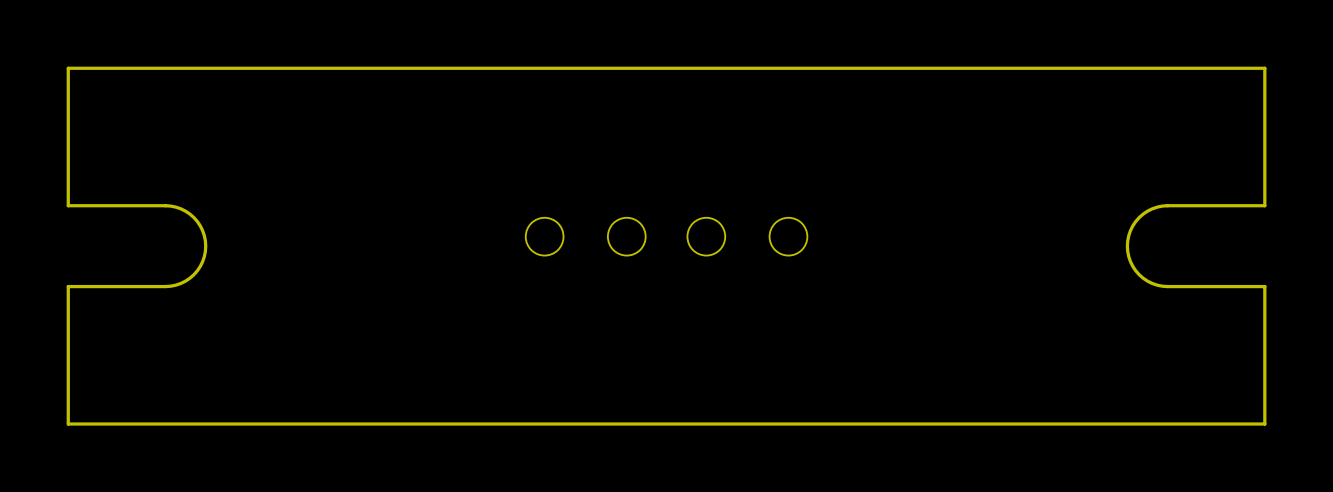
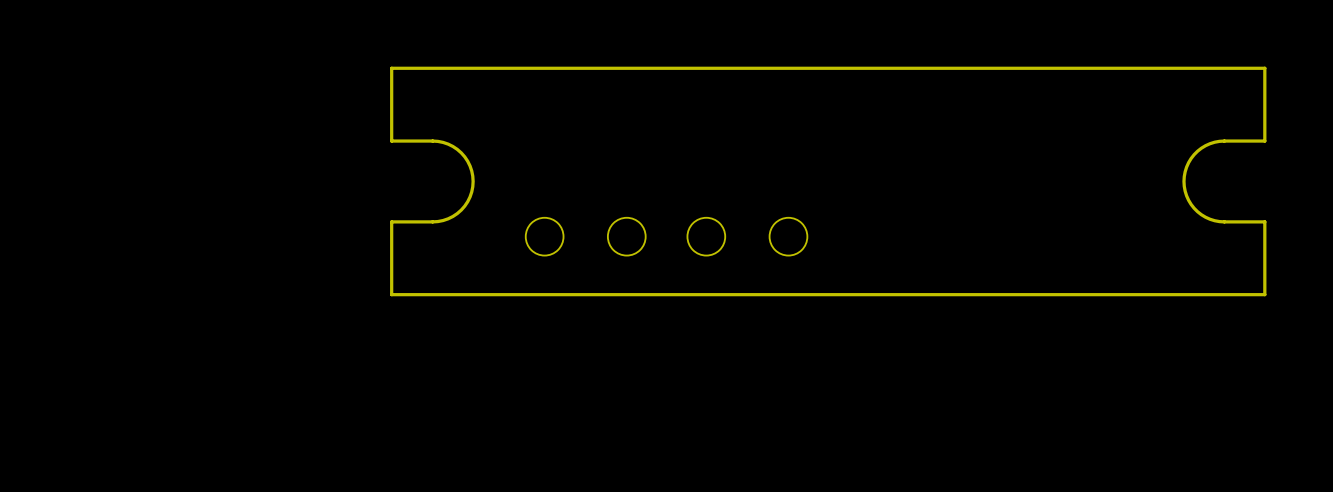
board edge: (391, 68) (68, 68) (68, 205) (175, 207) (189, 214) (197, 221) (204, 235) (205, 246) (204, 256) (197, 270) (189, 278) (175, 285) (68, 286) (68, 424) (1264, 424) (1264, 294) -> (391, 68) (391, 141) (437, 141) (452, 146) (467, 161) (473, 181) (467, 201) (452, 216) (437, 221) (391, 221) (391, 294) (1264, 294)
board edge: (1264, 141) (1264, 205) (1157, 207) (1143, 214) (1135, 221) (1128, 235) (1127, 246) (1128, 256) (1135, 270) (1143, 278) (1157, 285) (1264, 286) -> (1264, 141) (1219, 141) (1205, 145) (1194, 154) (1188, 162) (1183, 181) (1185, 191) (1191, 204) (1205, 217) (1219, 221) (1264, 221) (1264, 286)

